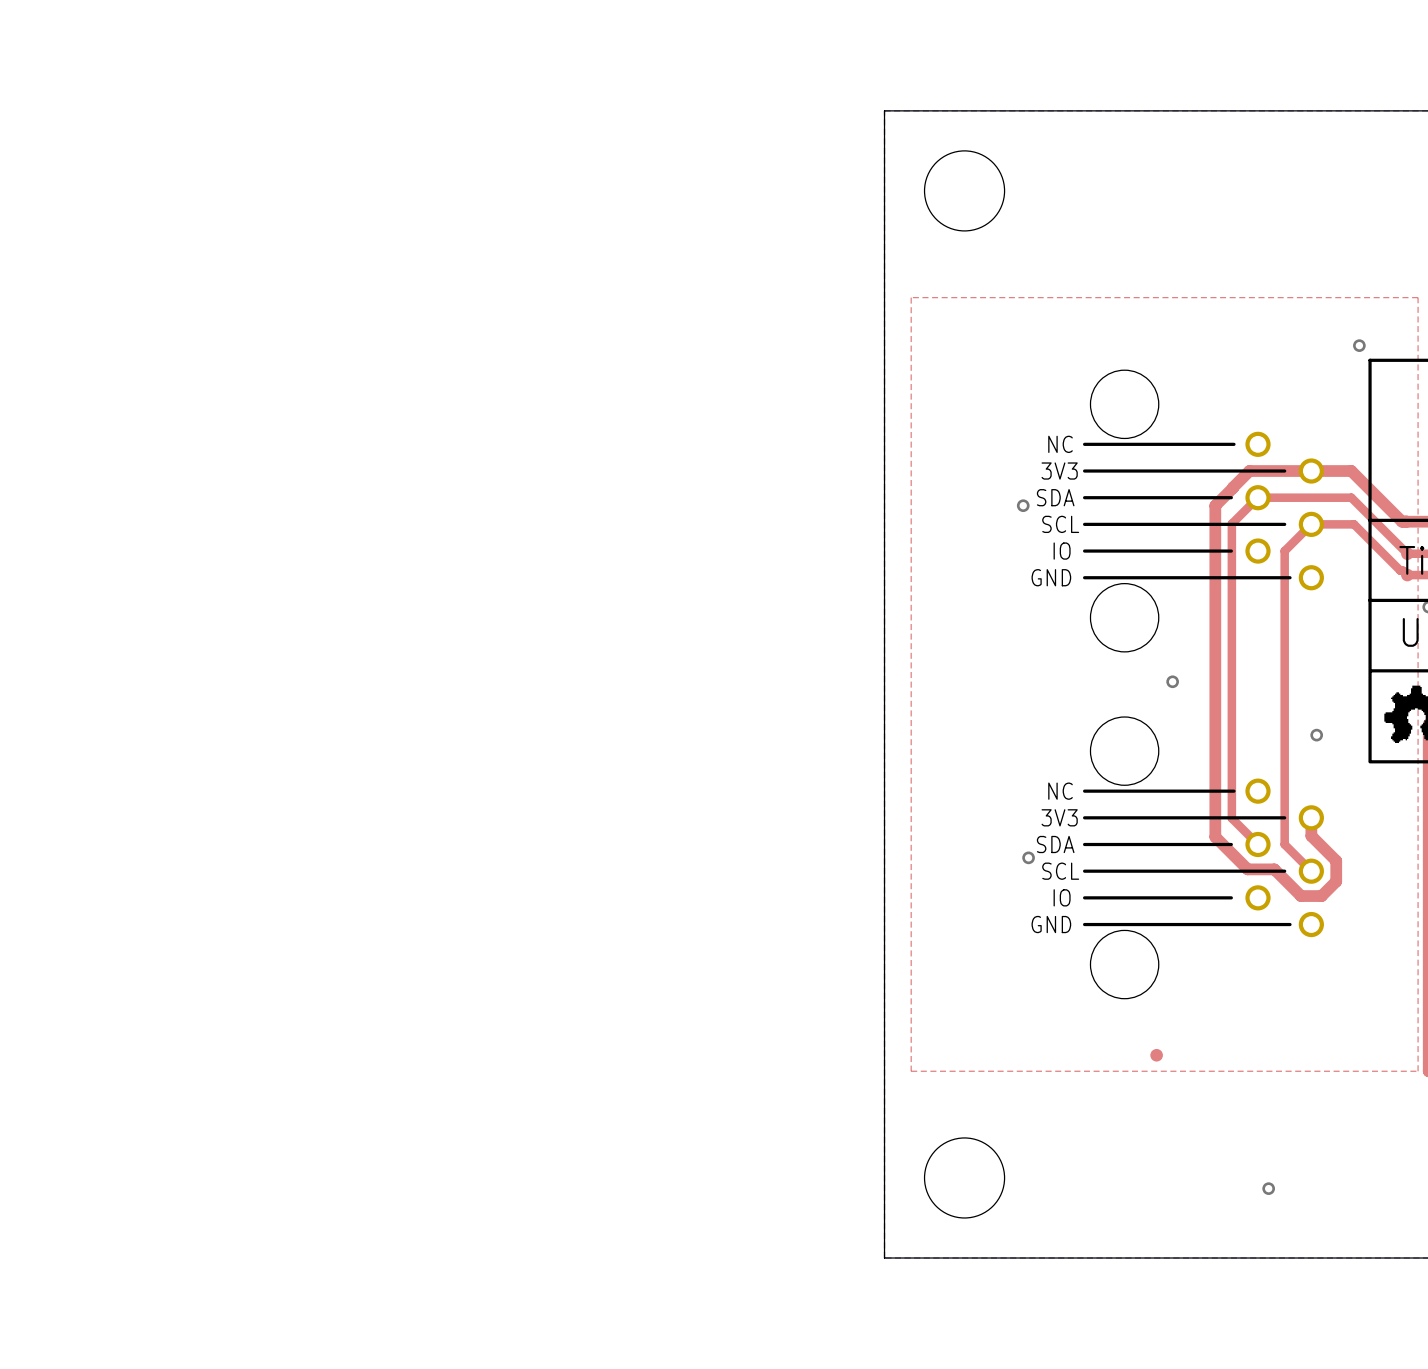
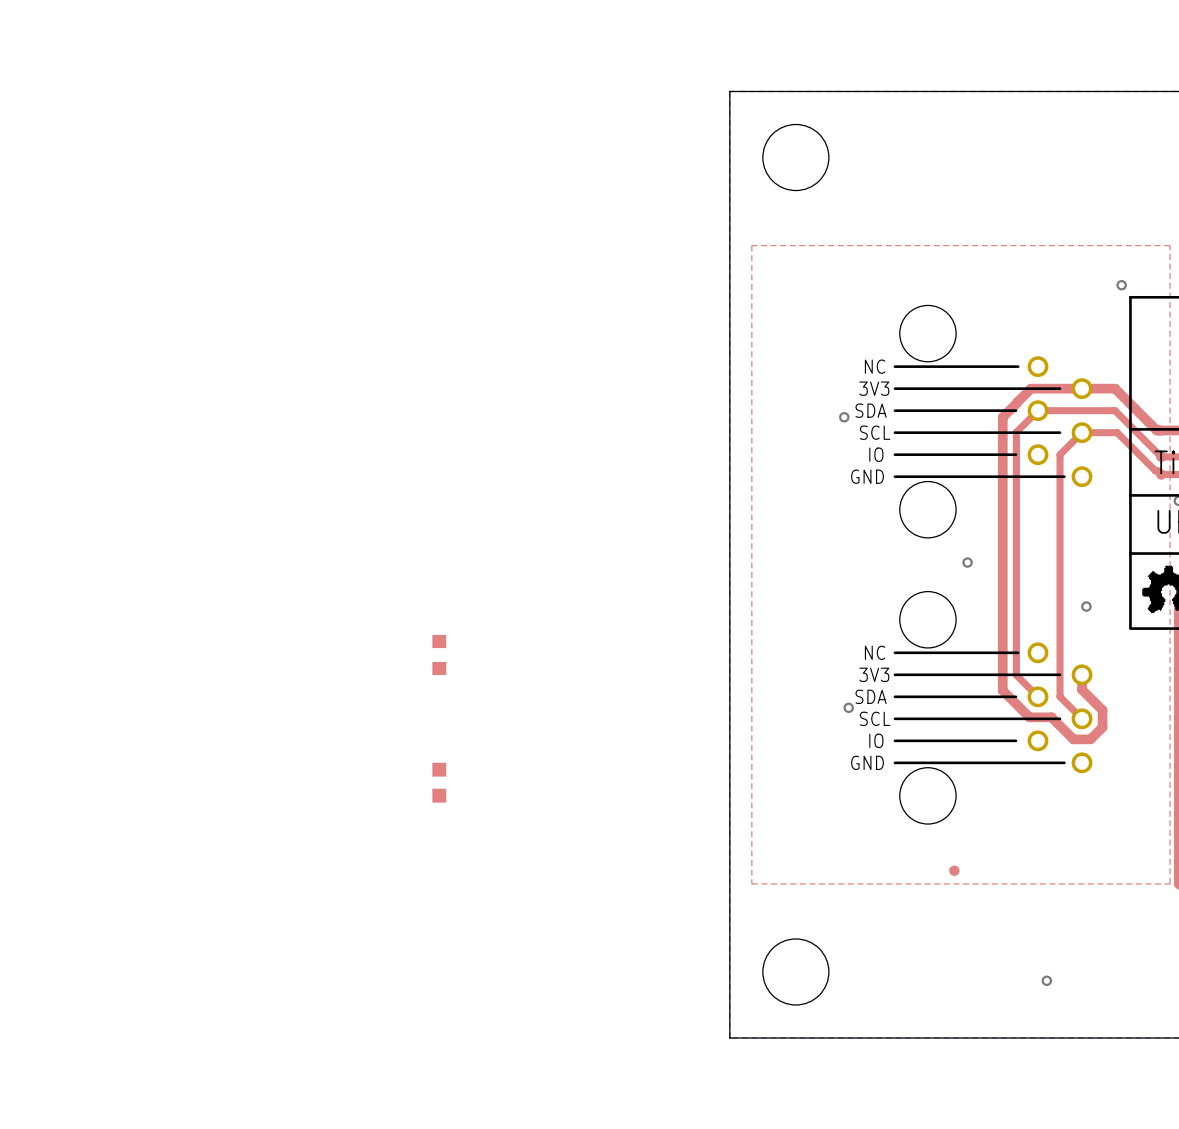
part: none -> (439, 654)
part: none -> (439, 782)

